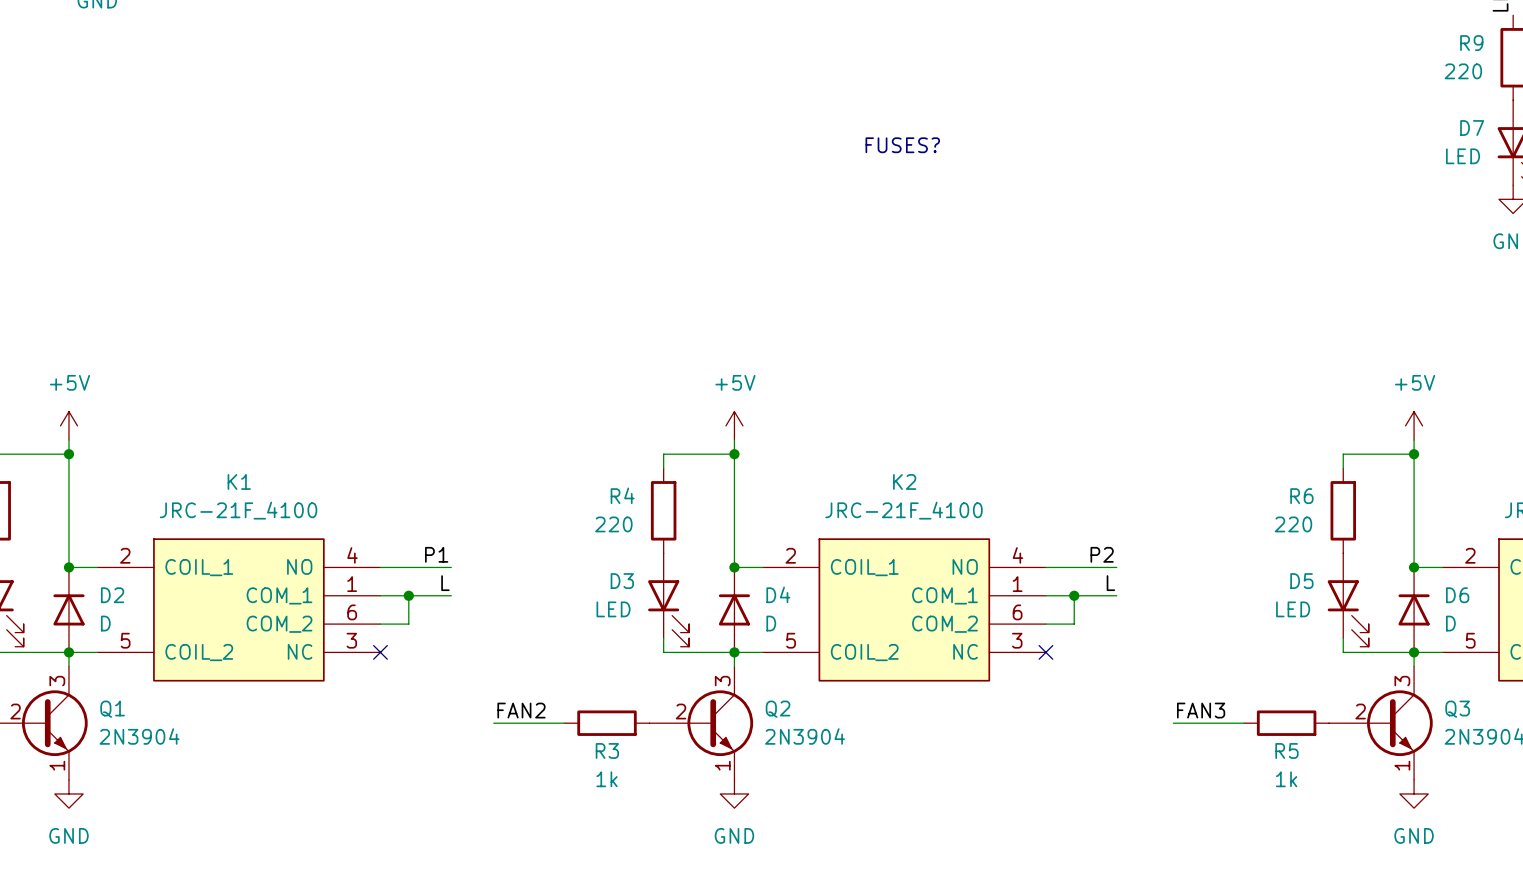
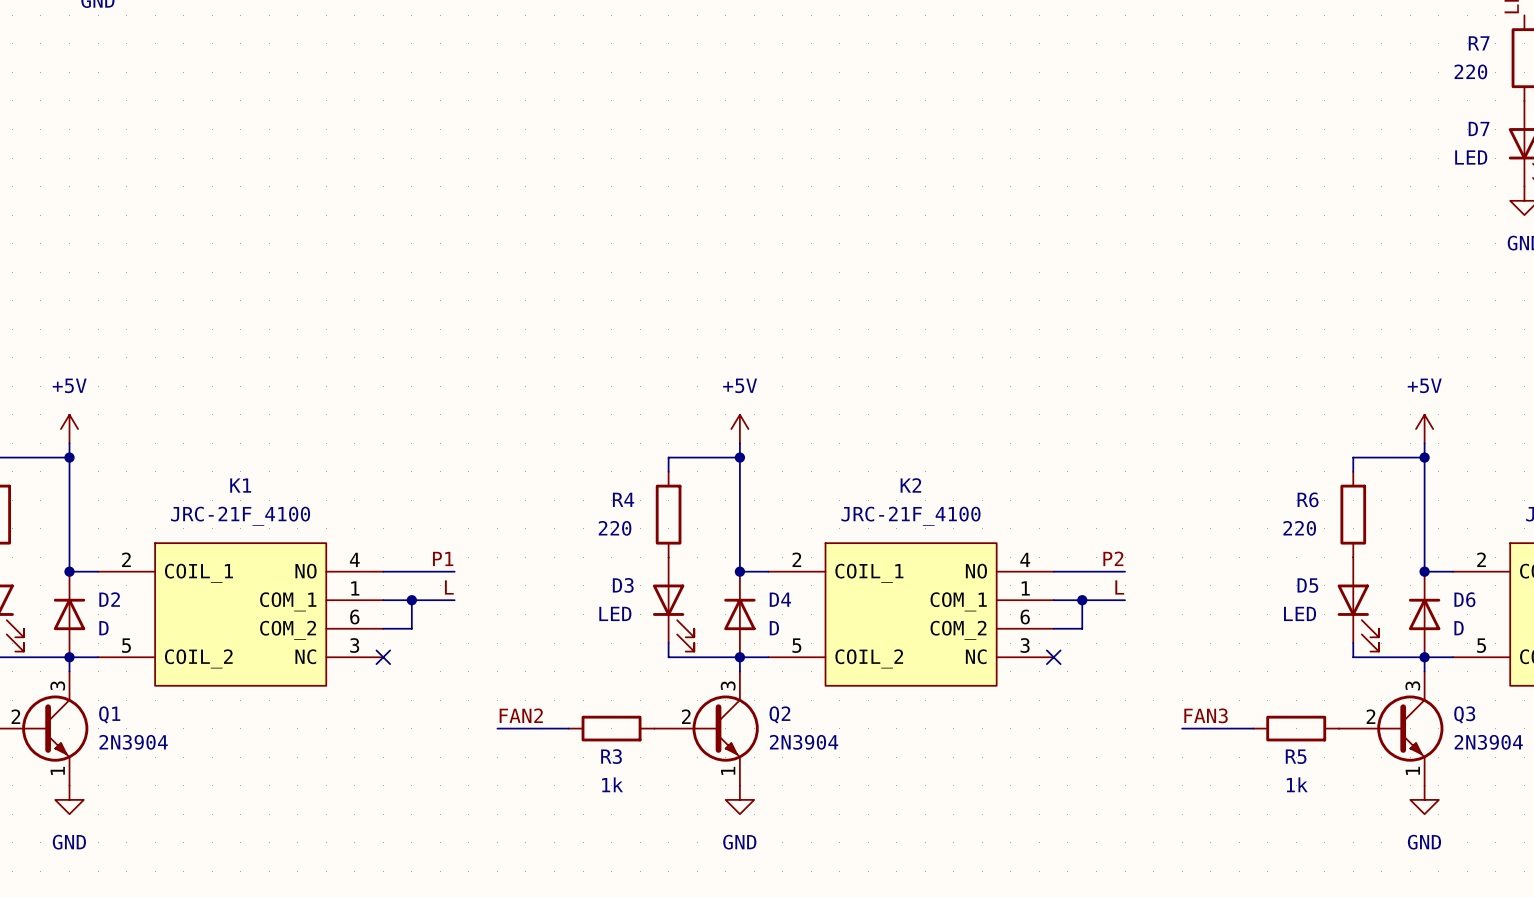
R9 name: R9 (1471, 43) -> R7 (1479, 43)
text: FUSES? (902, 145) -> none

